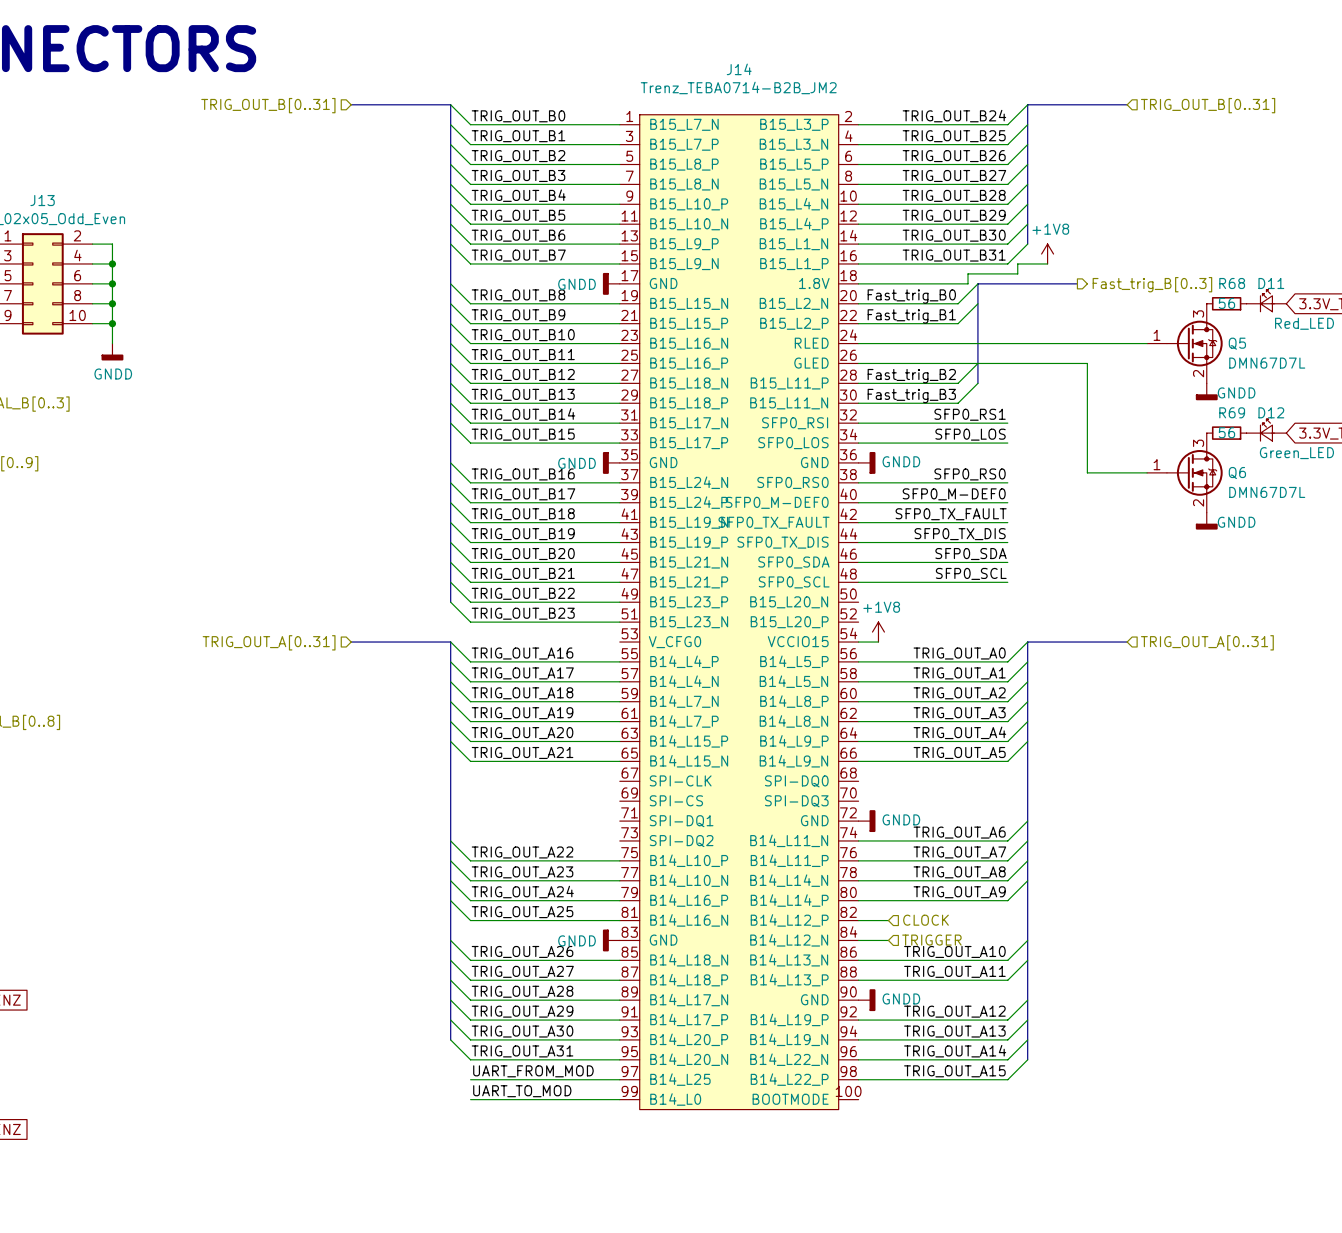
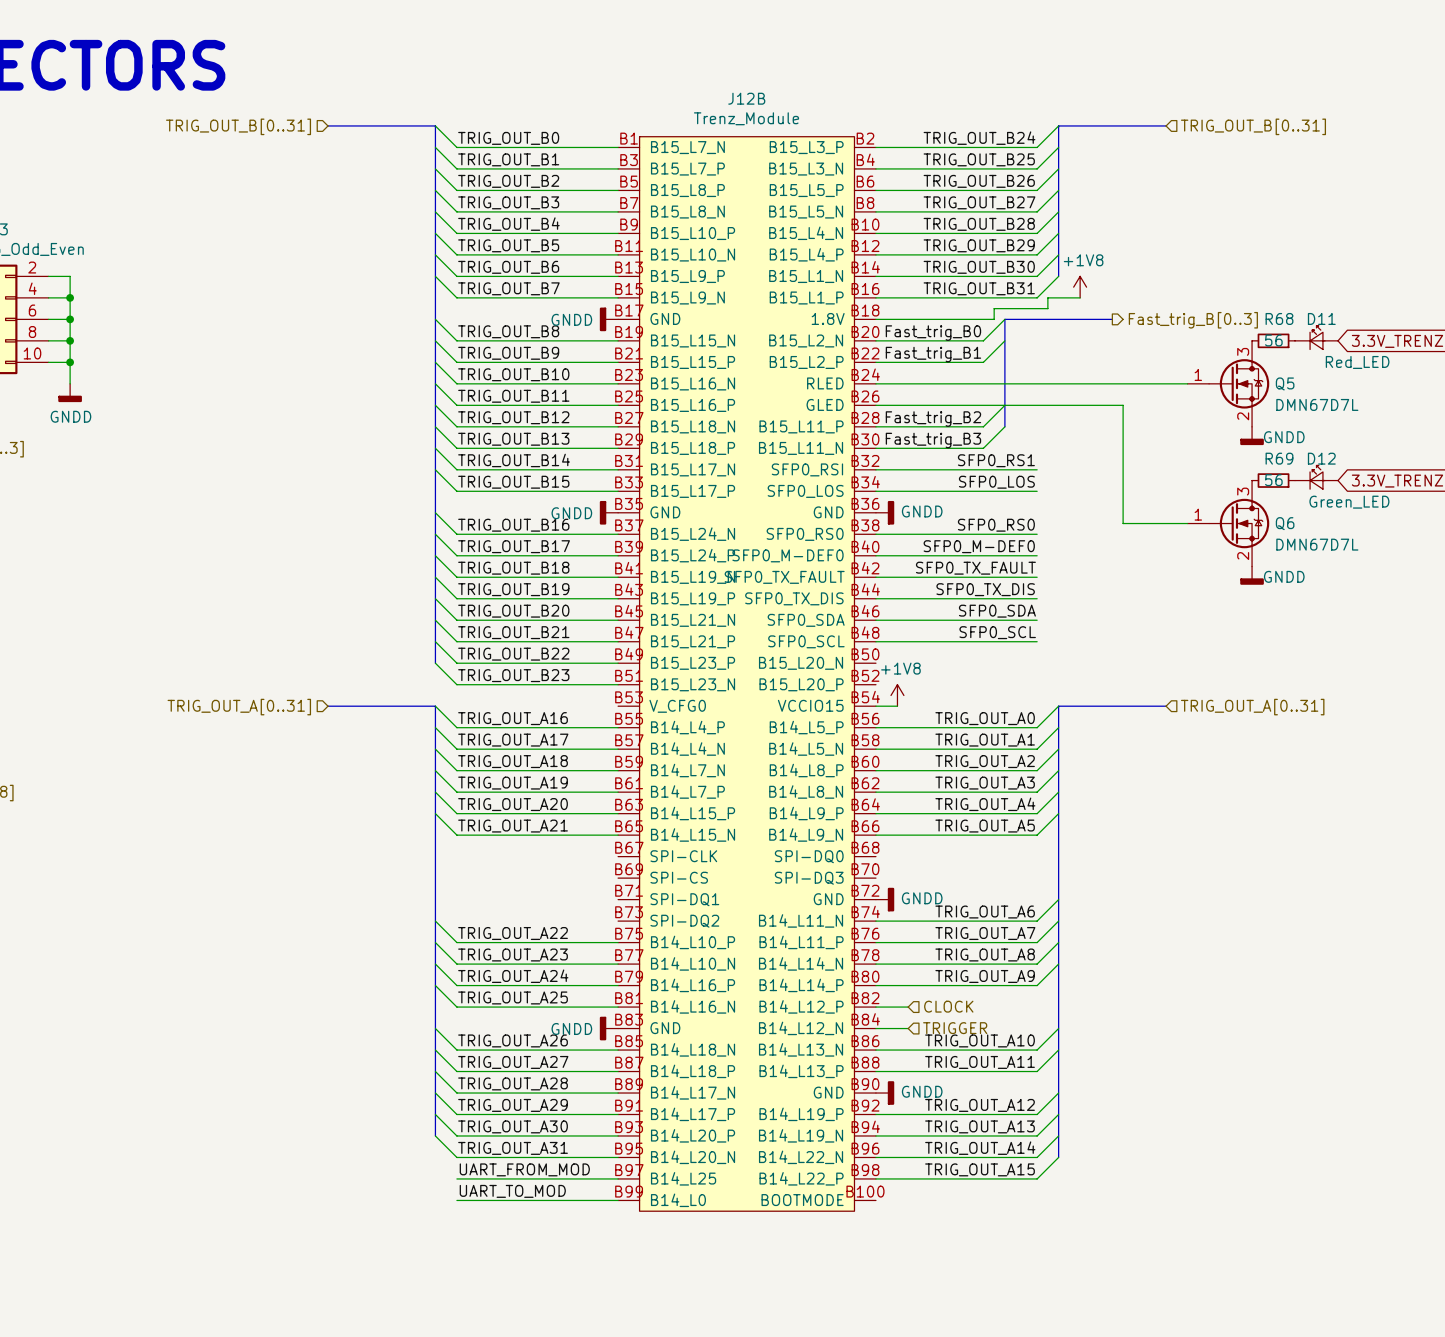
J12B: none -> Trenz_Module (747, 673)
J14: Trenz_TEBA0714-B2B_JM2 (739, 622) -> none

